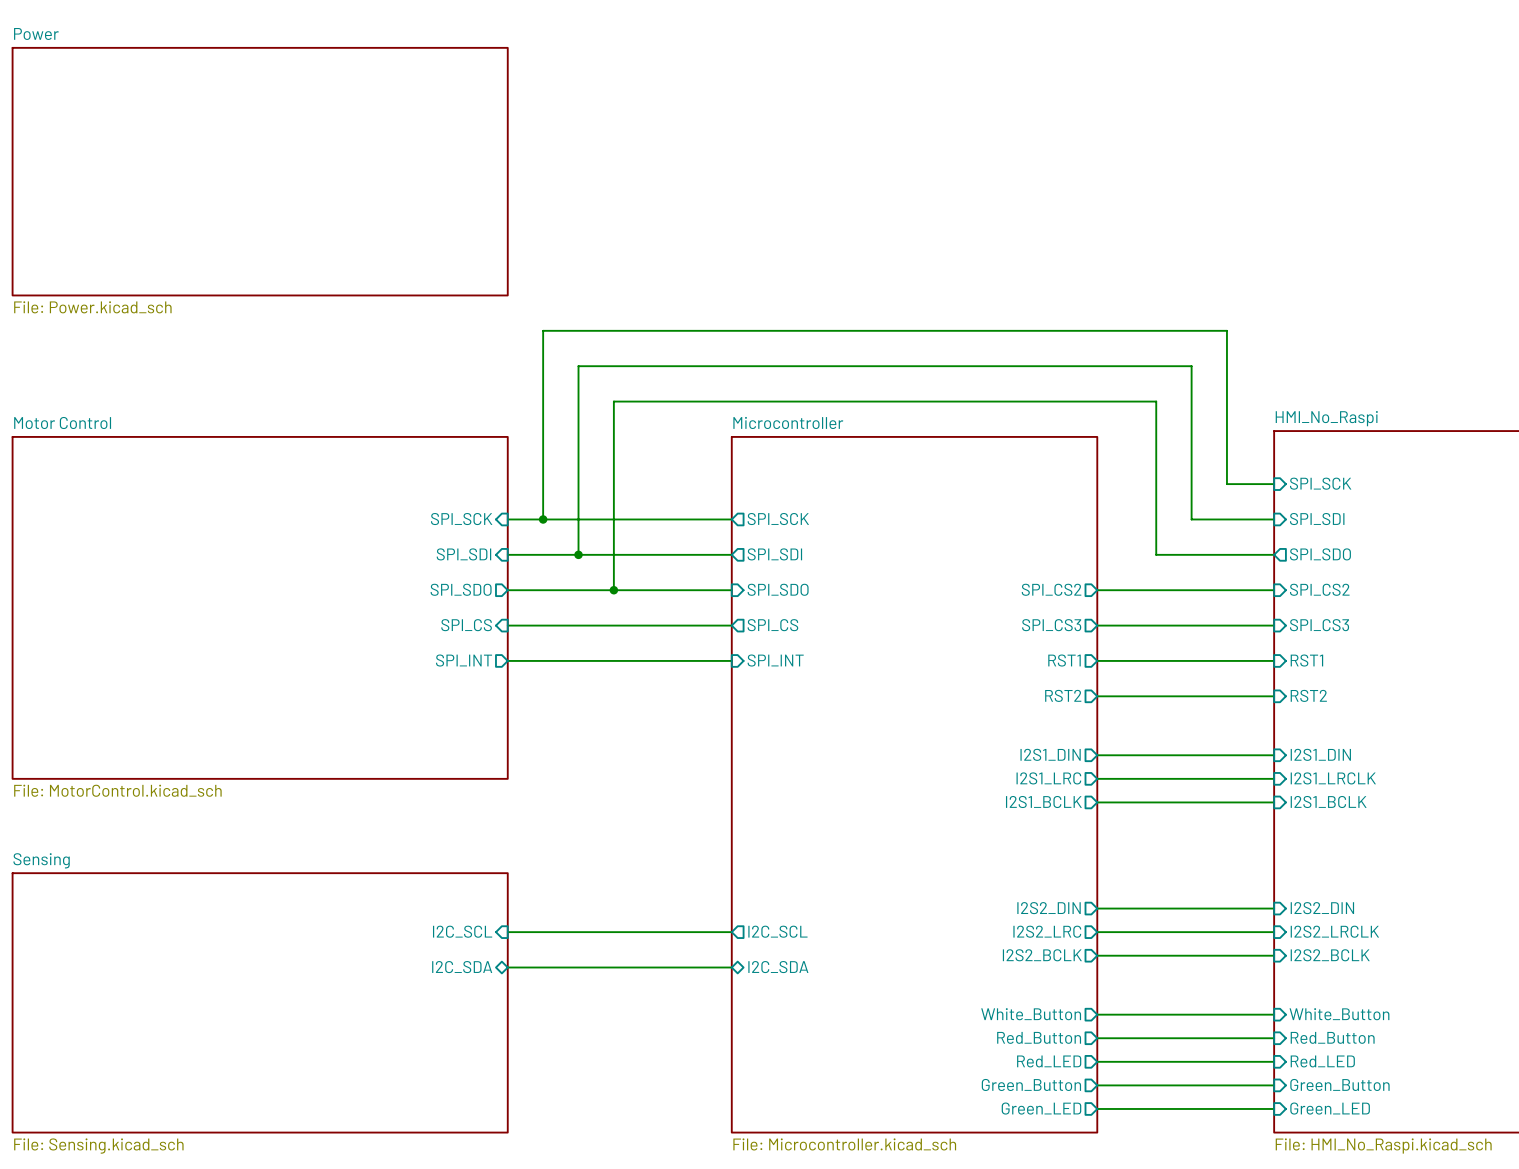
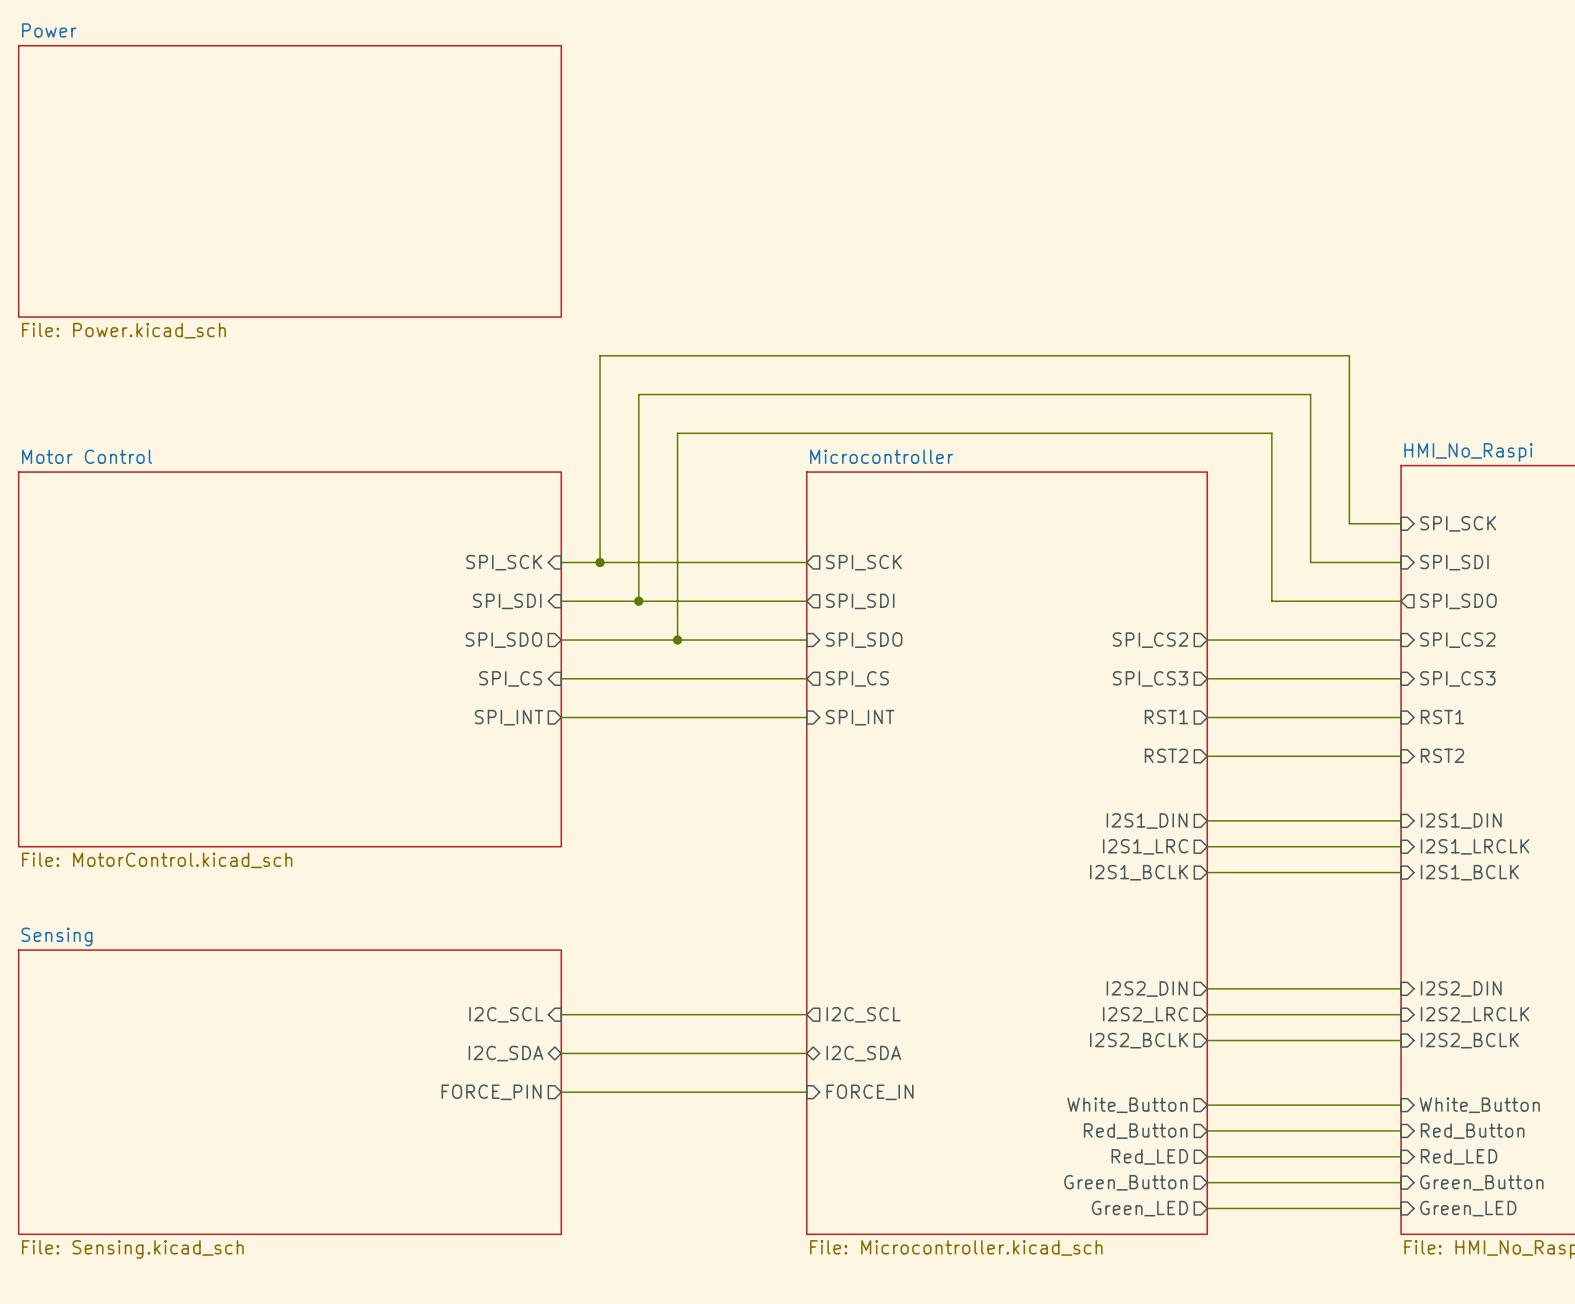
sheet pin: none -> FORCE_PIN (491, 1092)
wire: none -> (561, 1092) (806, 1092)
sheet pin: none -> FORCE_IN (870, 1092)

